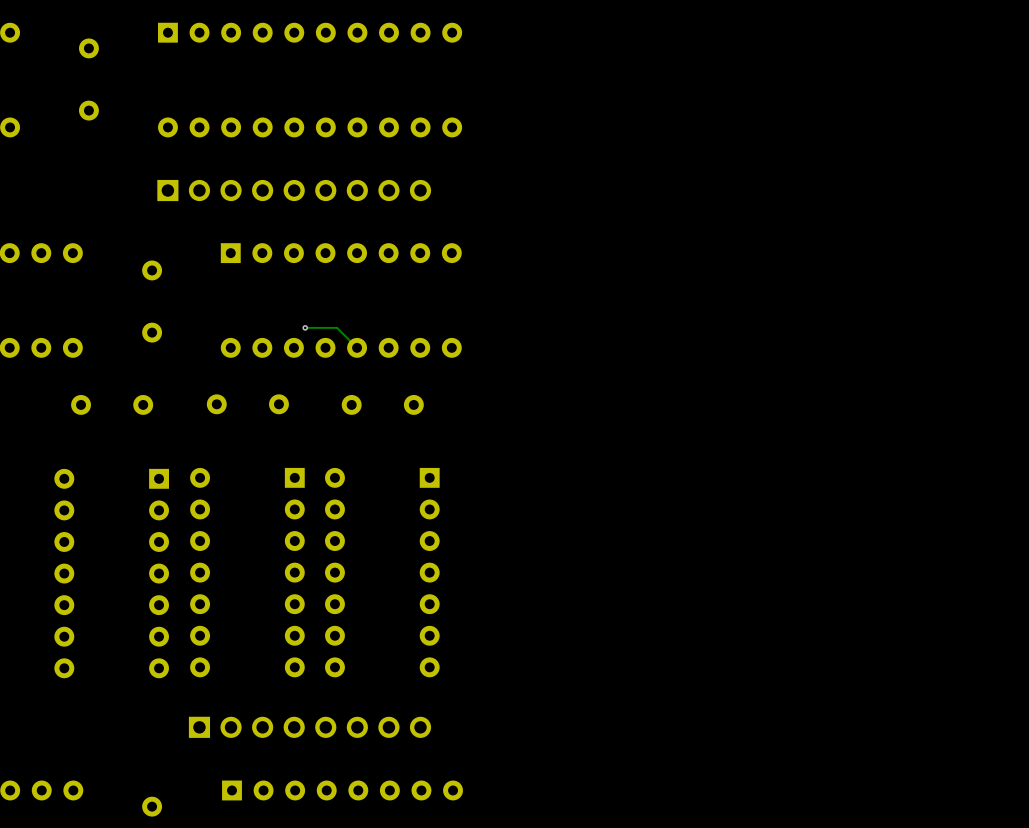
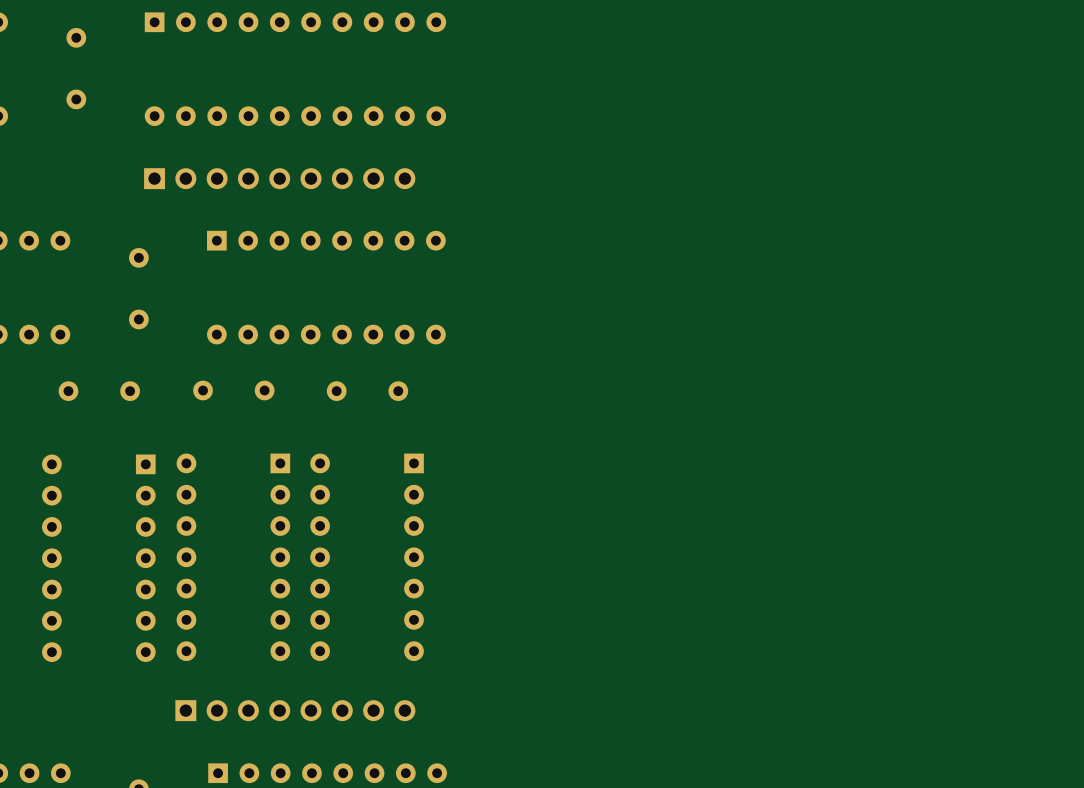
track: (305, 327) (337, 327) (357, 347) -> none
via: (305, 327) -> none

